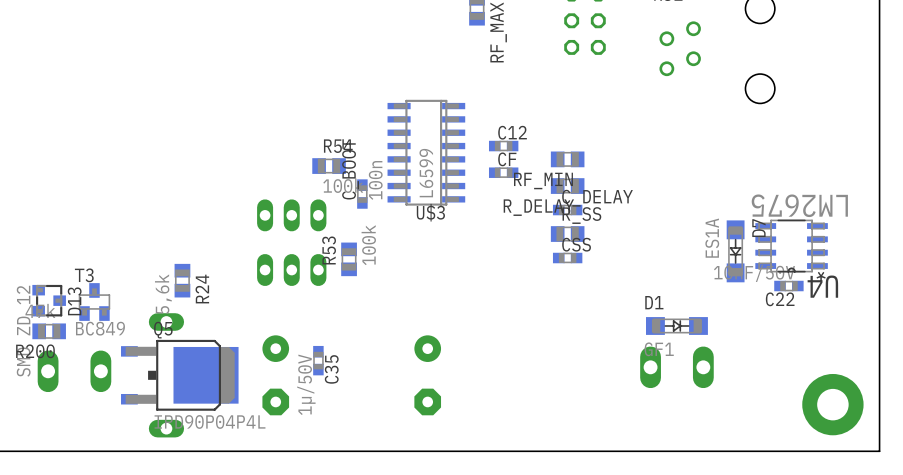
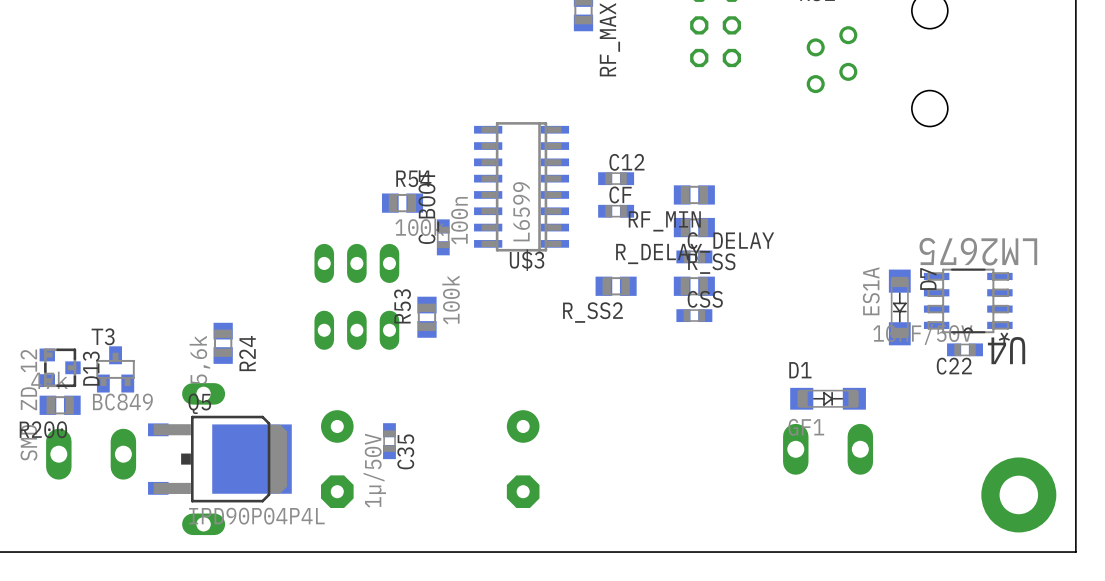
R_SS2: none -> (616, 286)

